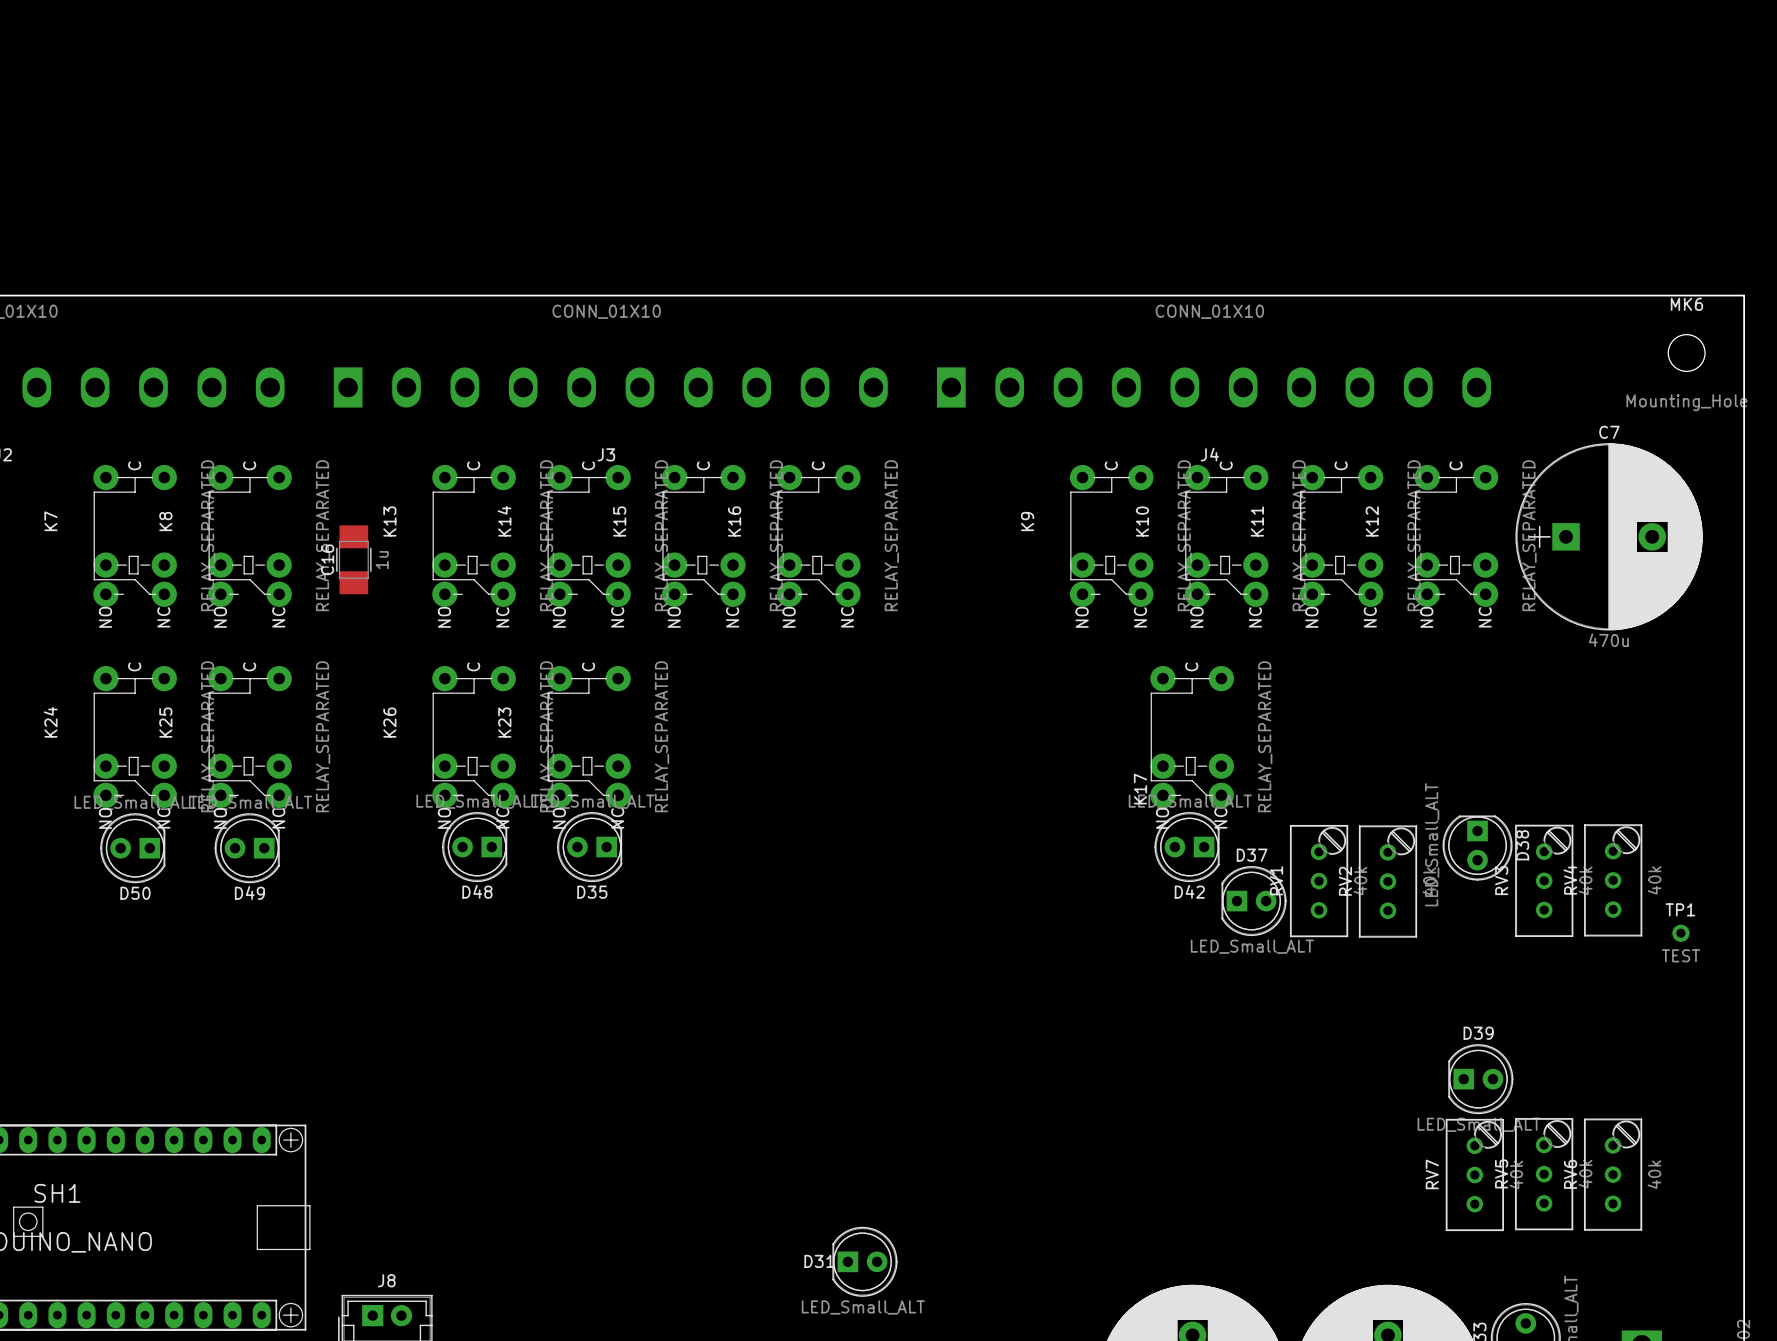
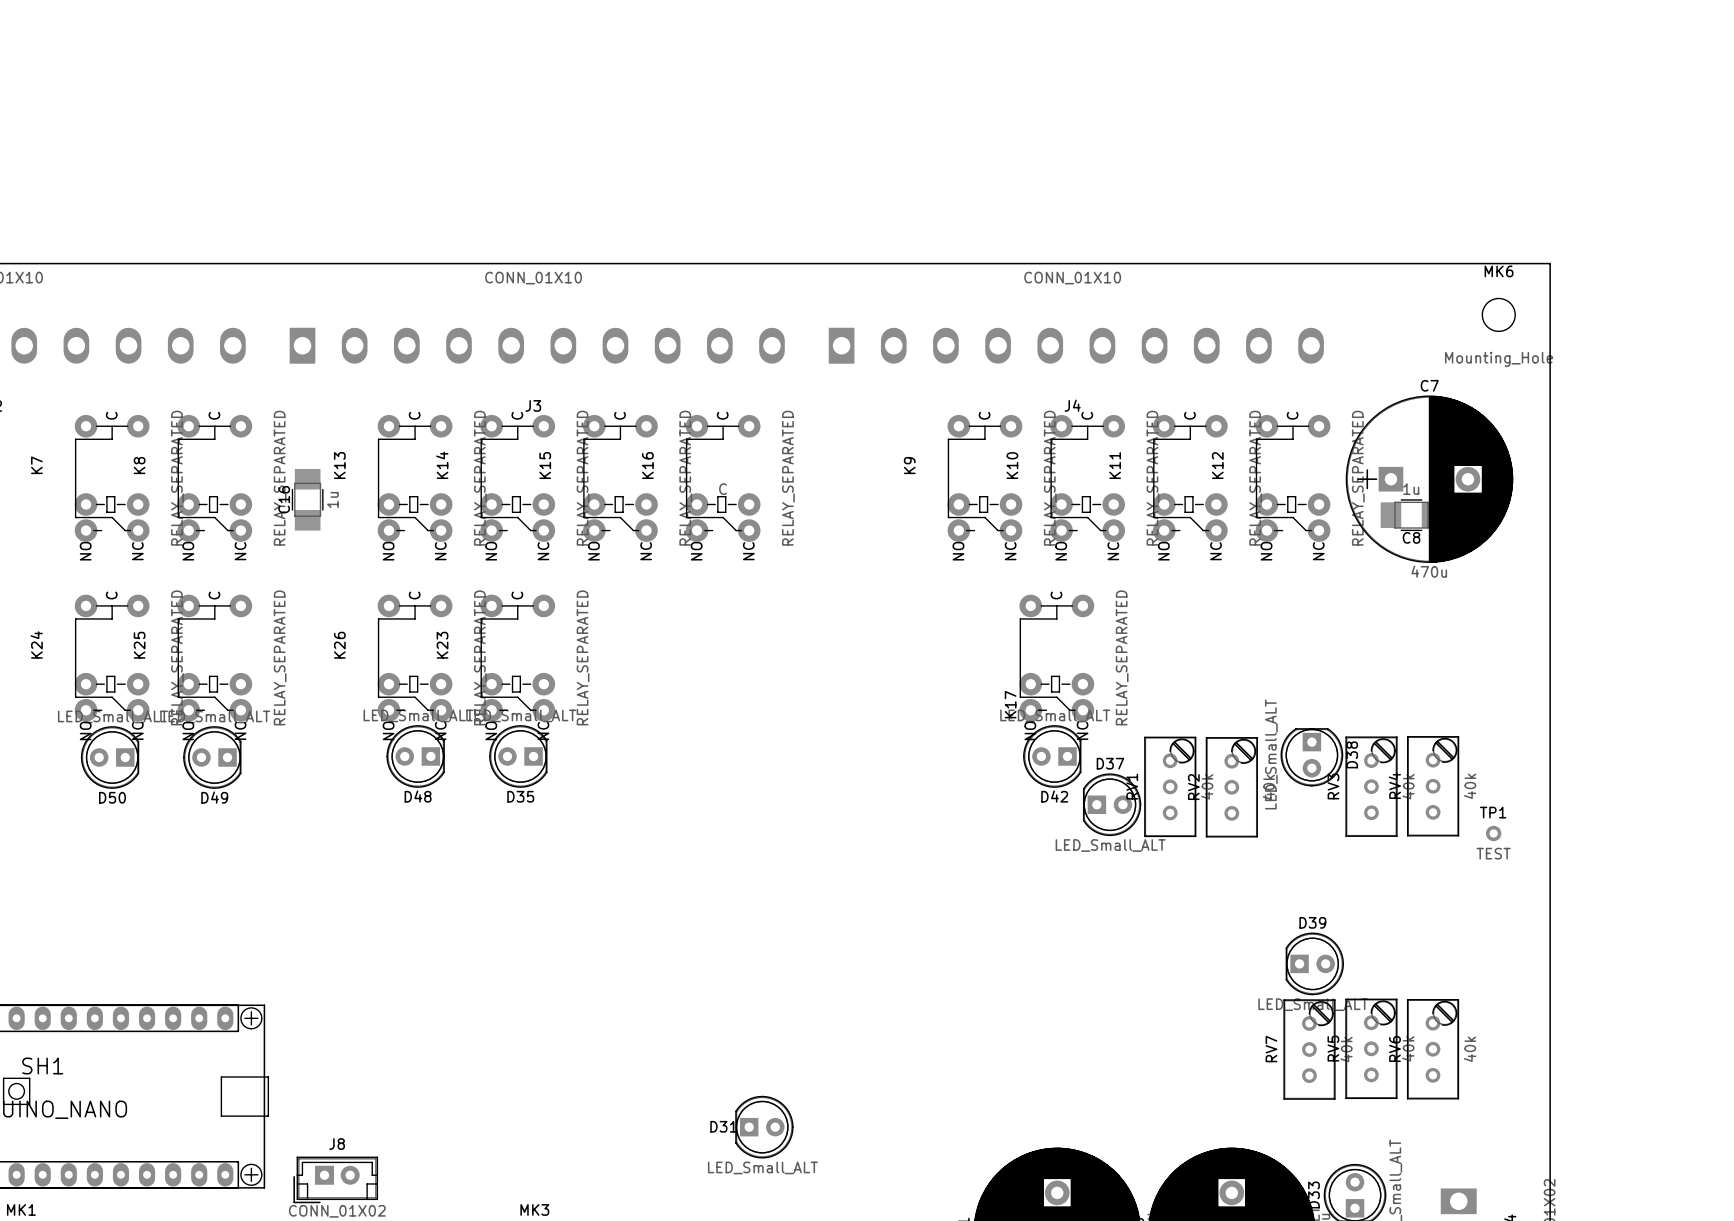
part: none -> C (723, 489)
C8: none -> 1u (1411, 515)

